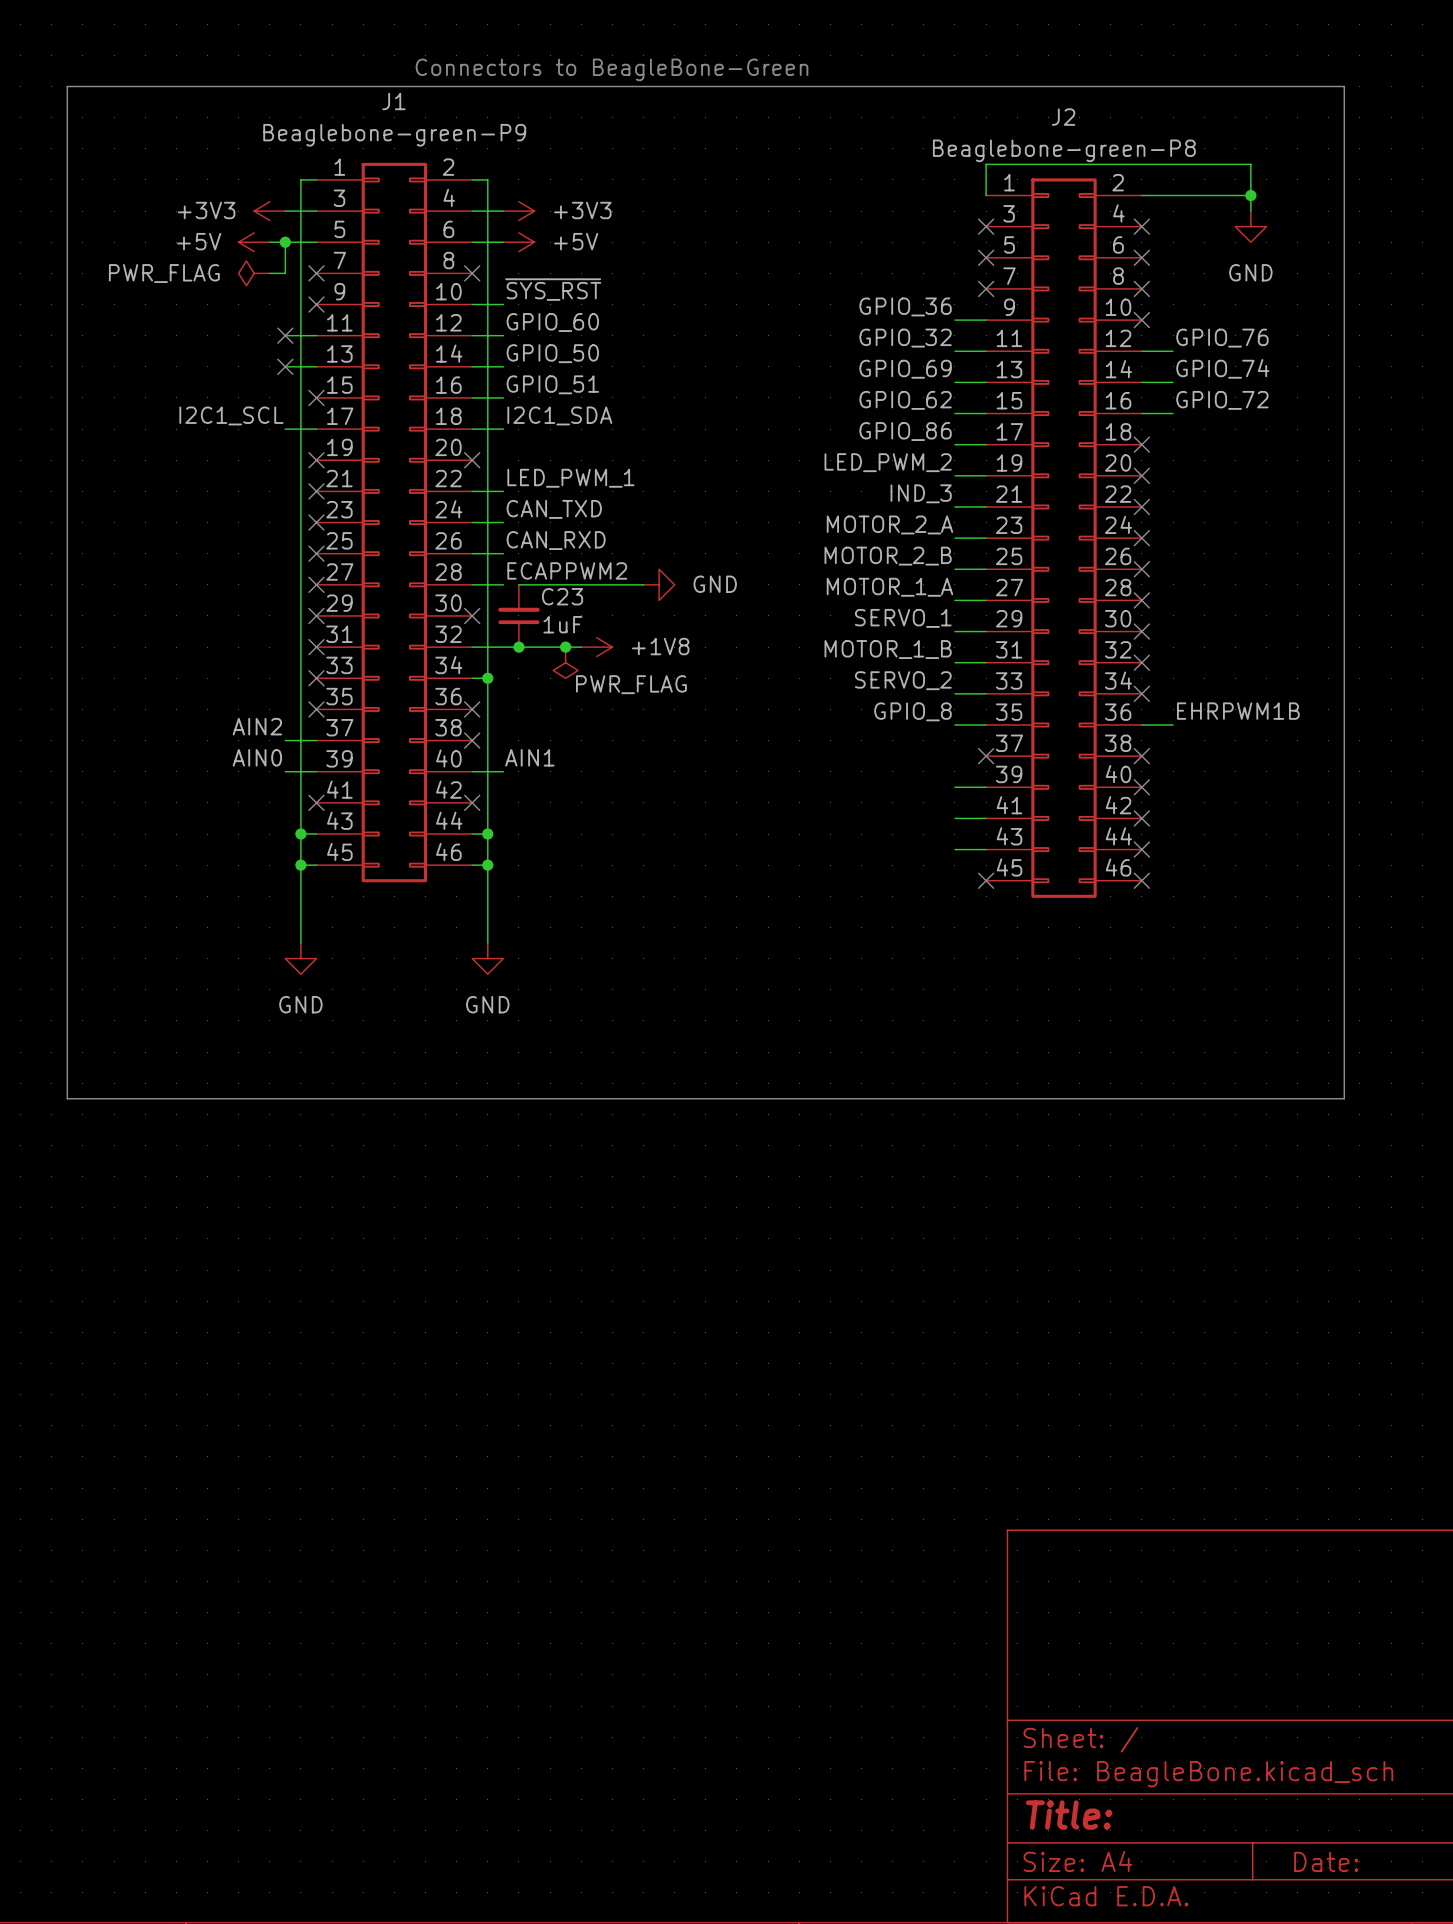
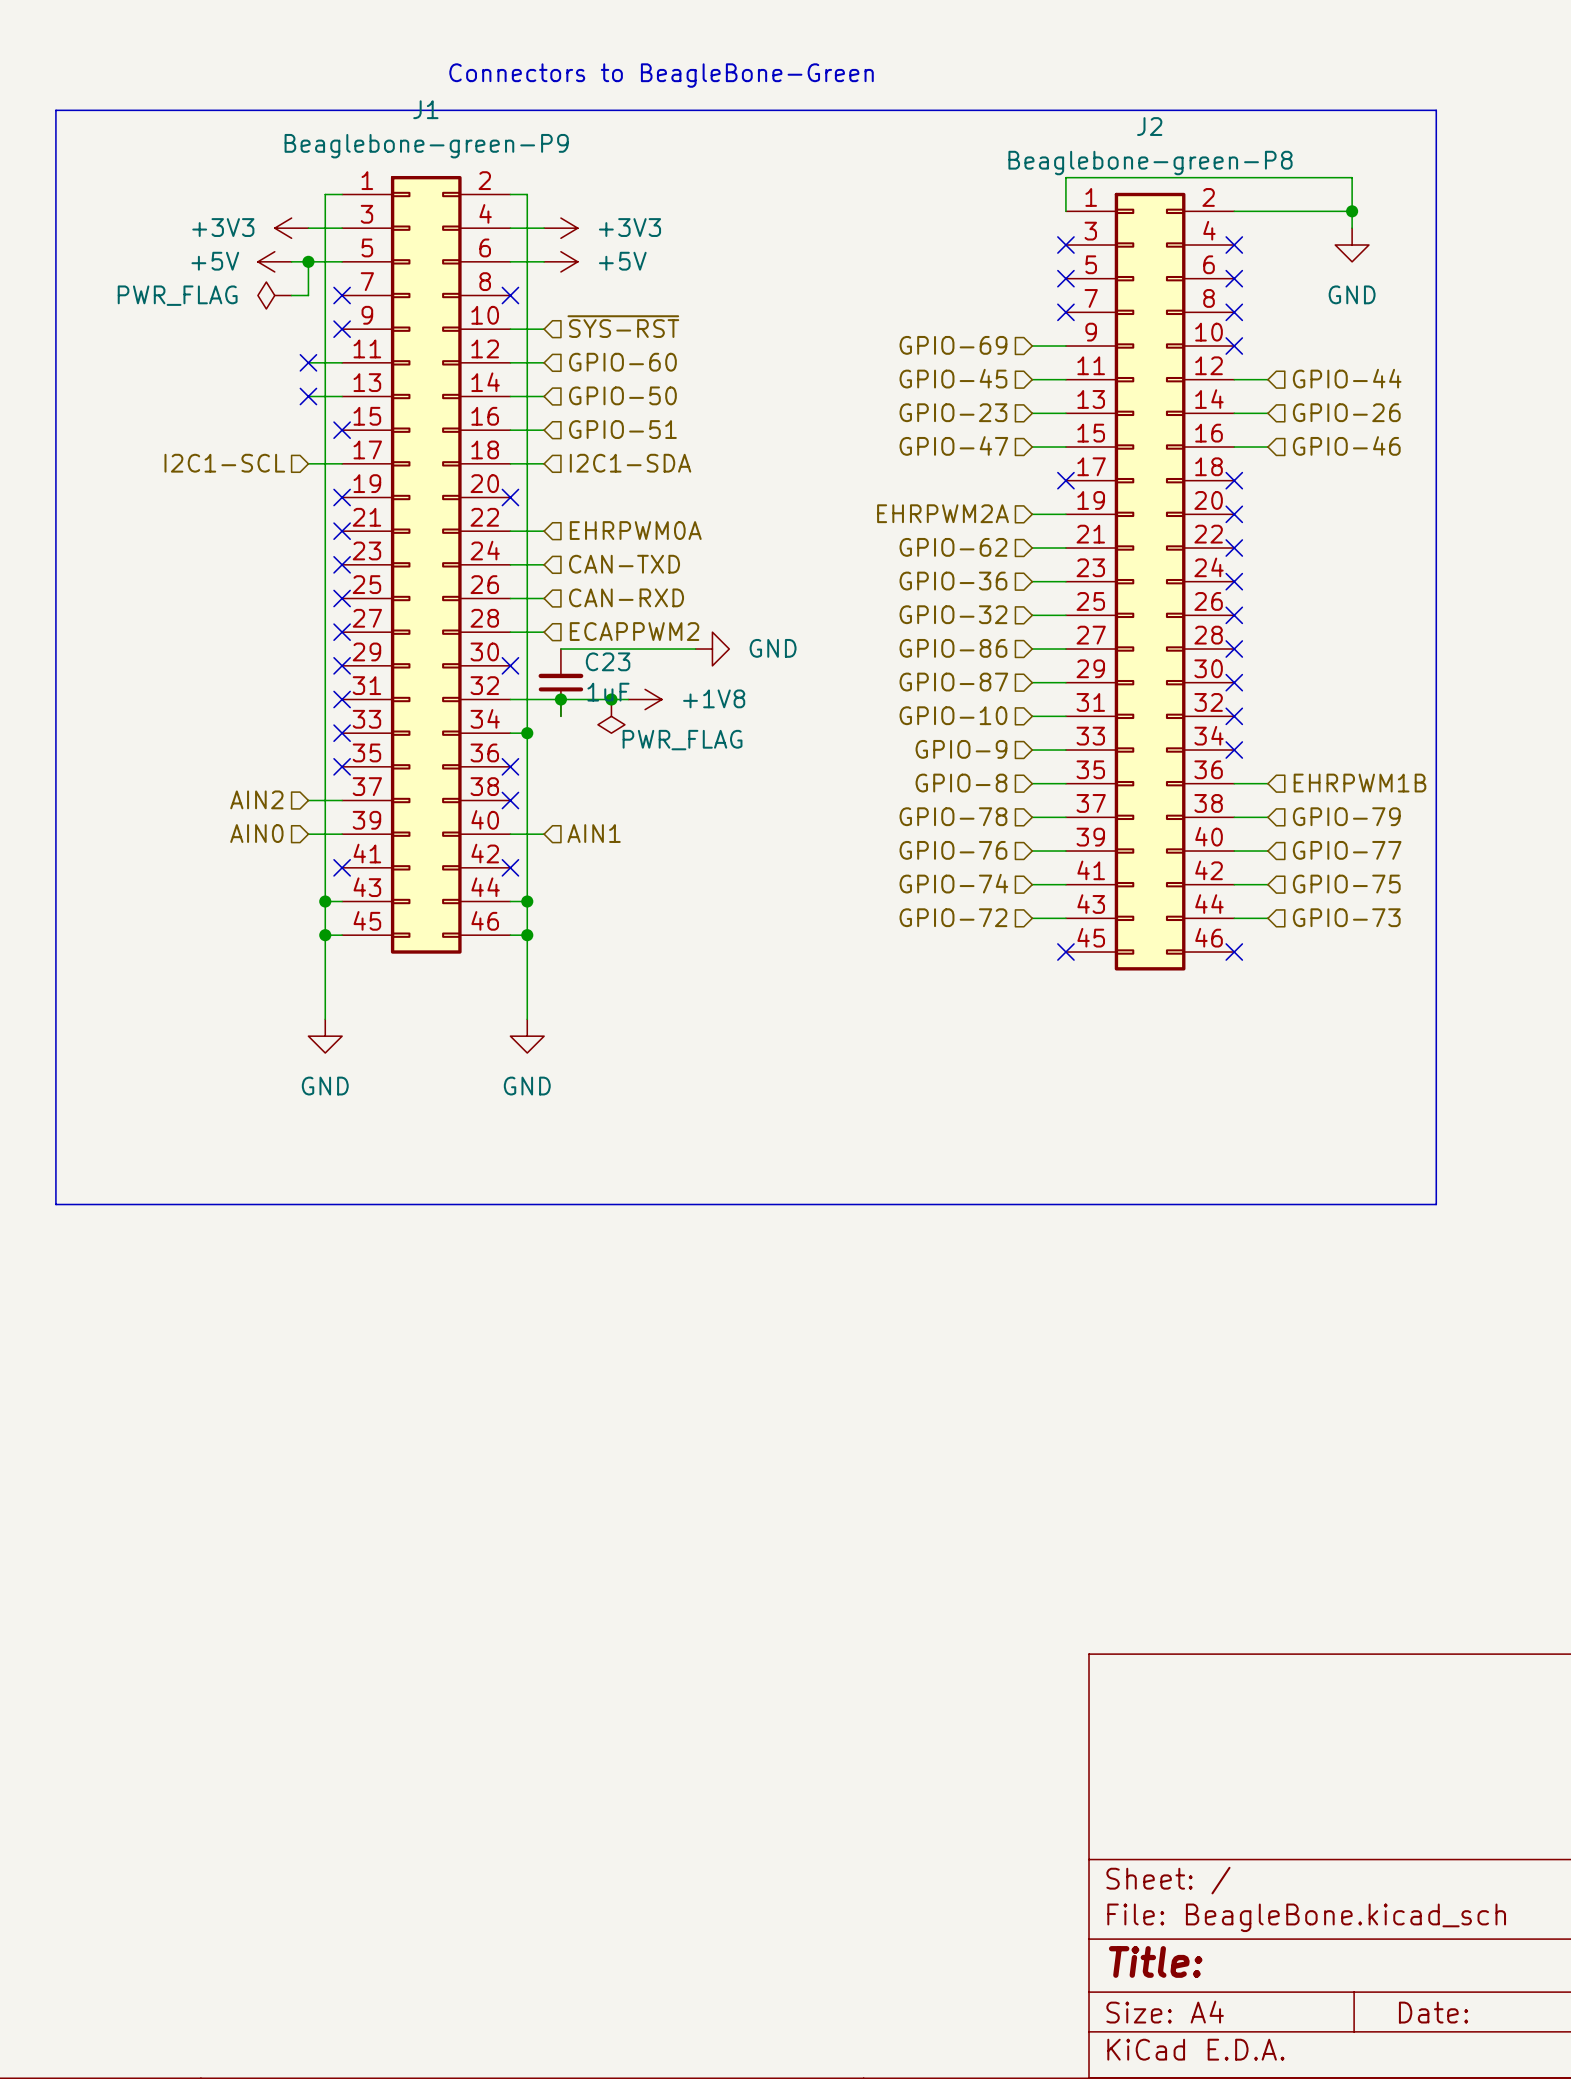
line: (67, 86) (1344, 86) (1344, 1098) (67, 1098) (67, 86) -> (55, 110) (1436, 110) (1436, 1204) (55, 1204) (55, 110)
label: ~{SYS_RST} (553, 289) -> none
hierarchical label: none -> ~{SYS-RST} (623, 326)
label: GPIO_36 (905, 306) -> none
hierarchical label: none -> GPIO-69 (953, 345)
label: GPIO_60 (552, 322) -> none
hierarchical label: none -> GPIO-60 (622, 362)
label: GPIO_32 (905, 338) -> none
label: GPIO_76 (1222, 338) -> none
hierarchical label: none -> GPIO-45 (953, 378)
hierarchical label: none -> GPIO-44 (1347, 378)
label: GPIO_50 (552, 353) -> none
hierarchical label: none -> GPIO-50 (622, 395)
label: GPIO_74 (1222, 368) -> none
label: GPIO_69 (905, 369) -> none
hierarchical label: none -> GPIO-23 (953, 412)
hierarchical label: none -> GPIO-26 (1346, 412)
label: GPIO_51 (552, 384) -> none
hierarchical label: none -> GPIO-51 (622, 429)
label: GPIO_62 (905, 400) -> none
label: GPIO_72 (1222, 400) -> none
hierarchical label: none -> GPIO-47 (953, 445)
hierarchical label: none -> GPIO-46 (1346, 445)
label: I2C1_SCL (231, 415) -> none
label: I2C1_SDA (559, 415) -> none
hierarchical label: none -> I2C1-SCL (224, 463)
hierarchical label: none -> I2C1-SDA (630, 463)
label: GPIO_86 (905, 431) -> none
wire: (954, 444) (986, 444) -> none
no-connect mark: none -> (1065, 480)
label: LED_PWM_2 (888, 462) -> none
hierarchical label: none -> EHRPWM2A (943, 513)
label: LED_PWM_1 (570, 478) -> none
hierarchical label: none -> EHRPWM0A (635, 530)
label: IND_3 (921, 493) -> none
hierarchical label: none -> GPIO-62 (953, 547)
label: CAN_TXD (554, 509) -> none
hierarchical label: none -> CAN-TXD (624, 564)
label: MOTOR_2_A (889, 524) -> none
hierarchical label: none -> GPIO-36 (953, 581)
label: CAN_RXD (556, 540) -> none
hierarchical label: none -> CAN-RXD (626, 597)
label: MOTOR_2_B (888, 556) -> none
hierarchical label: none -> GPIO-32 (953, 614)
label: ECAPPWM2 (567, 570) -> none
wire: (518, 584) (643, 584) -> (560, 649) (695, 649)
hierarchical label: none -> ECAPPWM2 (634, 631)
power symbol position: GND (659, 584) -> GND (712, 649)
label: MOTOR_1_A (889, 587) -> none
hierarchical label: none -> GPIO-86 (953, 648)
C23 position: (518, 615) -> (560, 682)
label: SERVO_1 (903, 618) -> none
hierarchical label: none -> GPIO-87 (953, 682)
wire: none -> (560, 699) (560, 716)
label: MOTOR_1_B (888, 649) -> none
hierarchical label: none -> GPIO-10 (953, 715)
label: SERVO_2 (903, 680) -> none
hierarchical label: none -> GPIO-9 (961, 749)
label: GPIO_8 (912, 711) -> none
label: EHRPWM1B (1238, 711) -> none
hierarchical label: none -> GPIO-8 (961, 783)
hierarchical label: none -> EHRPWM1B (1359, 783)
label: AIN2 (257, 726) -> none
hierarchical label: none -> AIN2 (256, 799)
hierarchical label: none -> GPIO-78 (953, 816)
hierarchical label: none -> GPIO-79 (1346, 816)
wire: none -> (1032, 817) (1065, 817)
no-connect mark: (986, 756) -> none
wire: none -> (1234, 817) (1267, 817)
no-connect mark: (1141, 756) -> none
label: AIN0 (257, 757) -> none
label: AIN1 (529, 757) -> none
hierarchical label: none -> AIN0 (256, 833)
hierarchical label: none -> AIN1 (594, 833)
hierarchical label: none -> GPIO-76 (953, 850)
hierarchical label: none -> GPIO-77 (1347, 850)
wire: none -> (1234, 851) (1267, 851)
no-connect mark: (1141, 787) -> none
hierarchical label: none -> GPIO-74 (953, 883)
hierarchical label: none -> GPIO-75 (1346, 884)
wire: none -> (1234, 884) (1267, 884)
no-connect mark: (1141, 818) -> none
hierarchical label: none -> GPIO-72 (953, 917)
hierarchical label: none -> GPIO-73 (1346, 917)
wire: none -> (1234, 918) (1267, 918)
no-connect mark: (1141, 849) -> none

